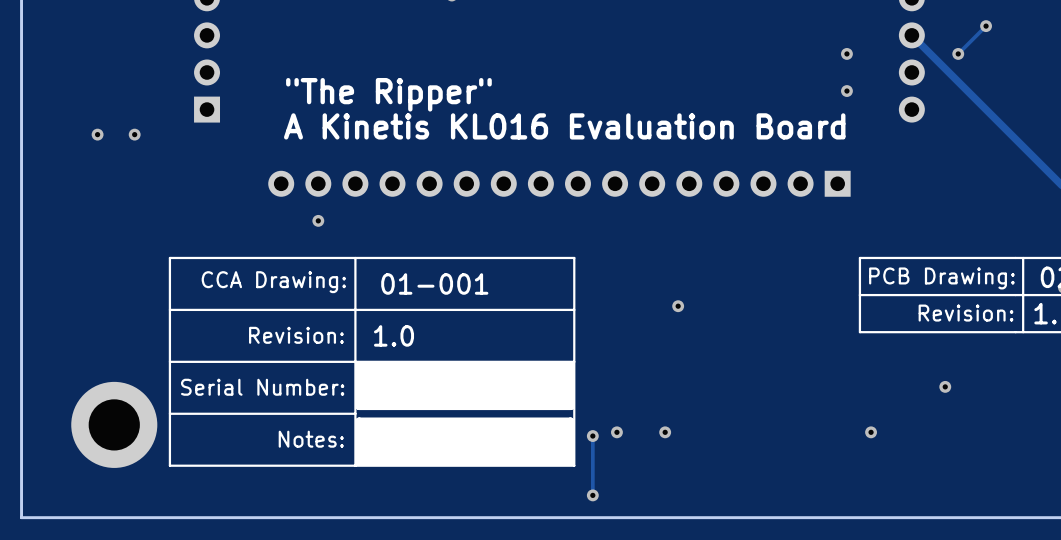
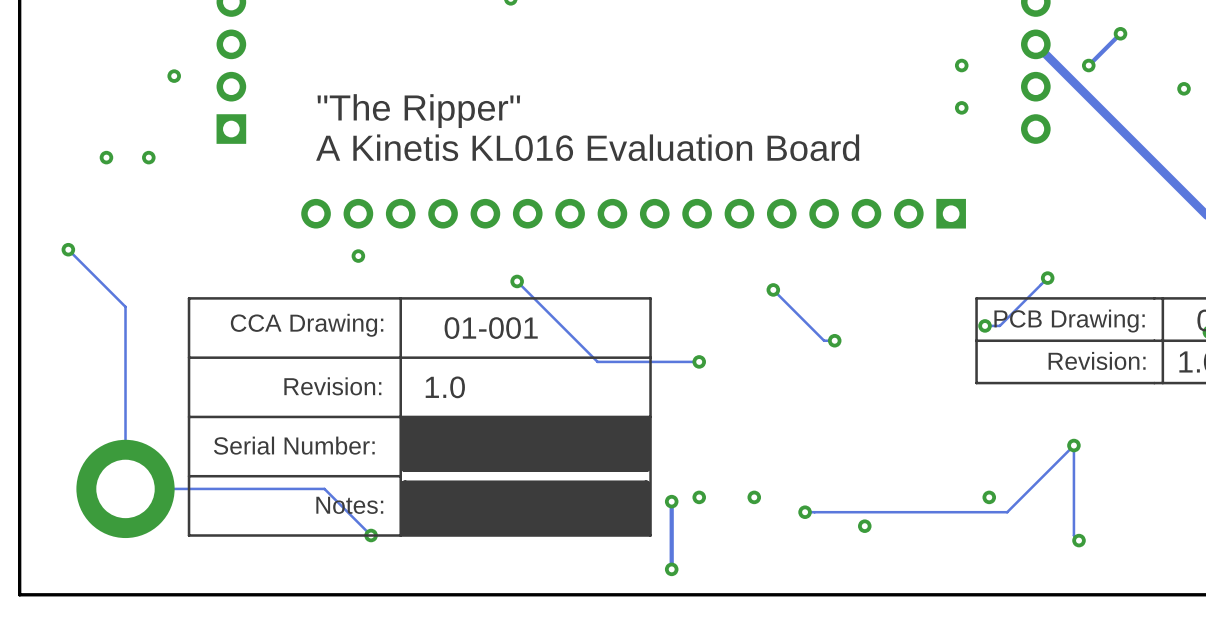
via: none -> (174, 76)
via: none -> (1184, 88)
track: none -> (68, 249) (125, 306) (125, 488) (324, 488) (371, 535)
via: none -> (68, 249)
track: none -> (1047, 278) (999, 325) (985, 325)
via: none -> (1047, 278)
track: none -> (517, 281) (597, 361) (699, 361)
via: none -> (517, 281)
track: none -> (773, 289) (824, 340) (834, 340)
via: none -> (773, 289)
via: none -> (985, 325)
via: none -> (834, 340)
via: (678, 306) -> none
via: none -> (699, 361)
track: none -> (805, 512) (1007, 512) (1073, 445) (1073, 535) (1079, 540)
via: none -> (805, 512)
via: none -> (864, 526)
via: none -> (371, 535)
via: none -> (1079, 540)

